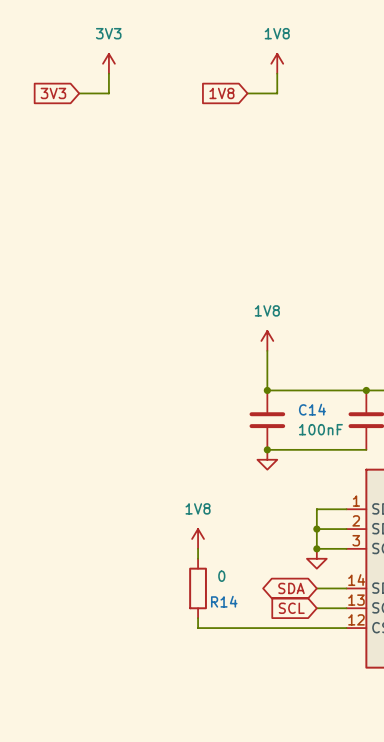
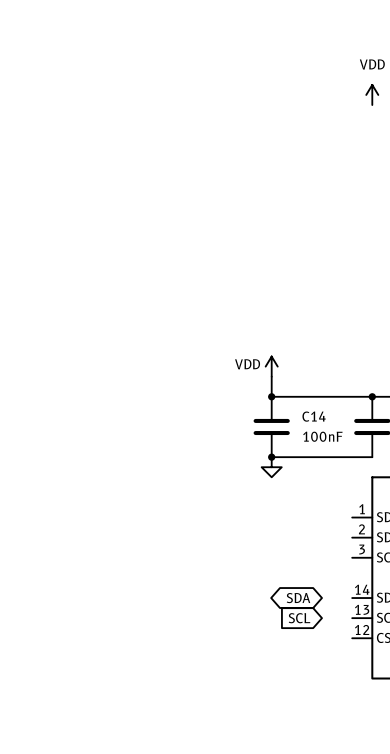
power symbol: 3V3 (108, 63) -> none
power symbol: 1V8 (277, 63) -> none
wire: (108, 73) (108, 93) (79, 93) -> none
wire: (277, 73) (277, 93) (247, 93) -> none
global label: 3V3 (53, 93) -> none
global label: 1V8 (221, 93) -> none
power symbol: none -> VDD (372, 94)
power symbol: 1V8 (267, 340) -> none
power symbol: none -> VDD (271, 366)
wire: (346, 509) (316, 509) (316, 548) (346, 548) -> none
wire: (316, 529) (346, 529) -> none
junction: (316, 529) -> none
power symbol: 1V8 (198, 538) -> none
wire: (198, 548) (198, 558) -> none
junction: (316, 548) -> none
power symbol: (316, 558) -> none
R14: 0 (198, 588) -> none
wire: (316, 588) (346, 588) -> none
wire: (316, 608) (346, 608) -> none
wire: (198, 618) (198, 628) (346, 628) -> none

